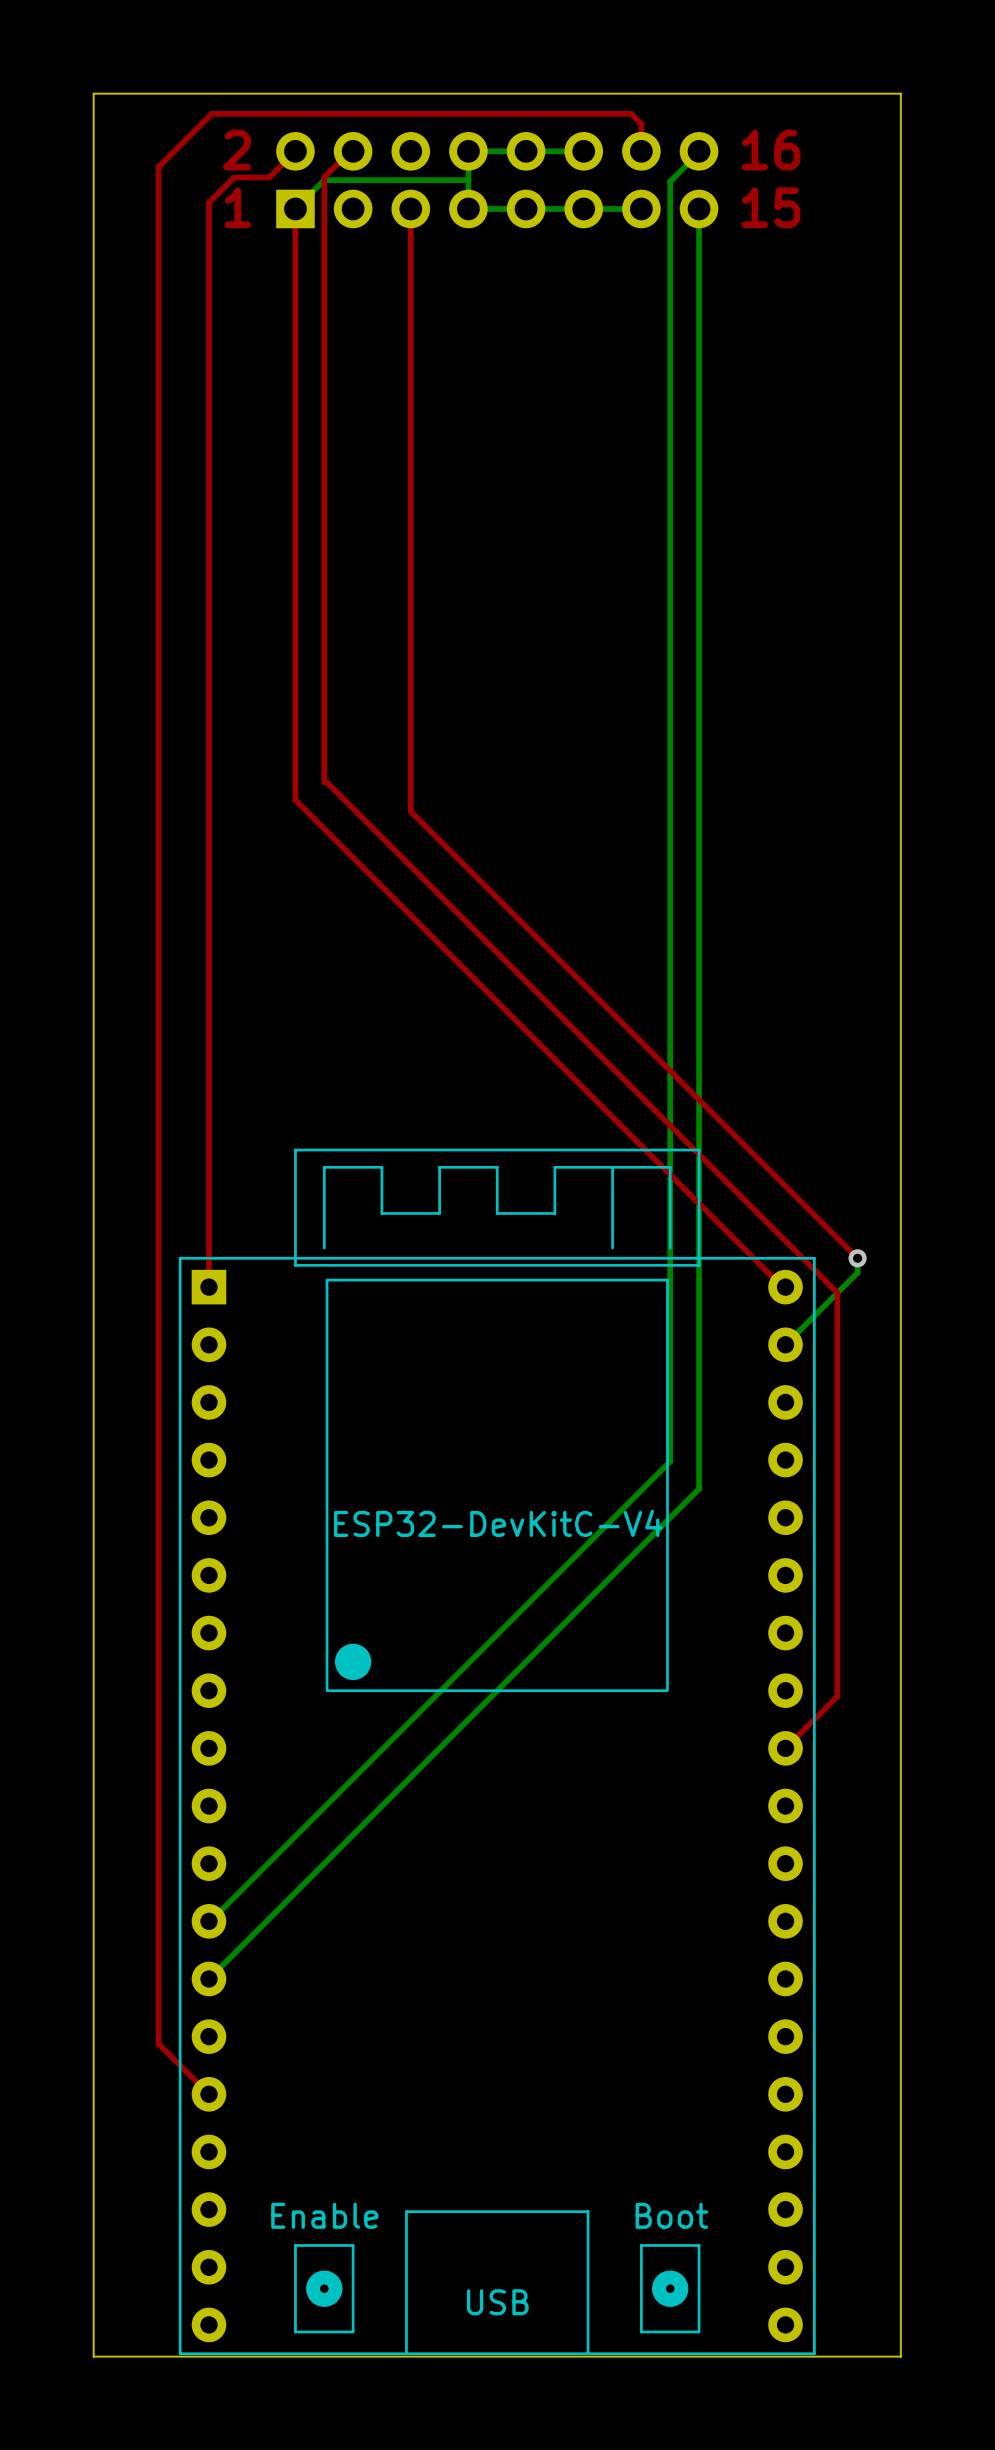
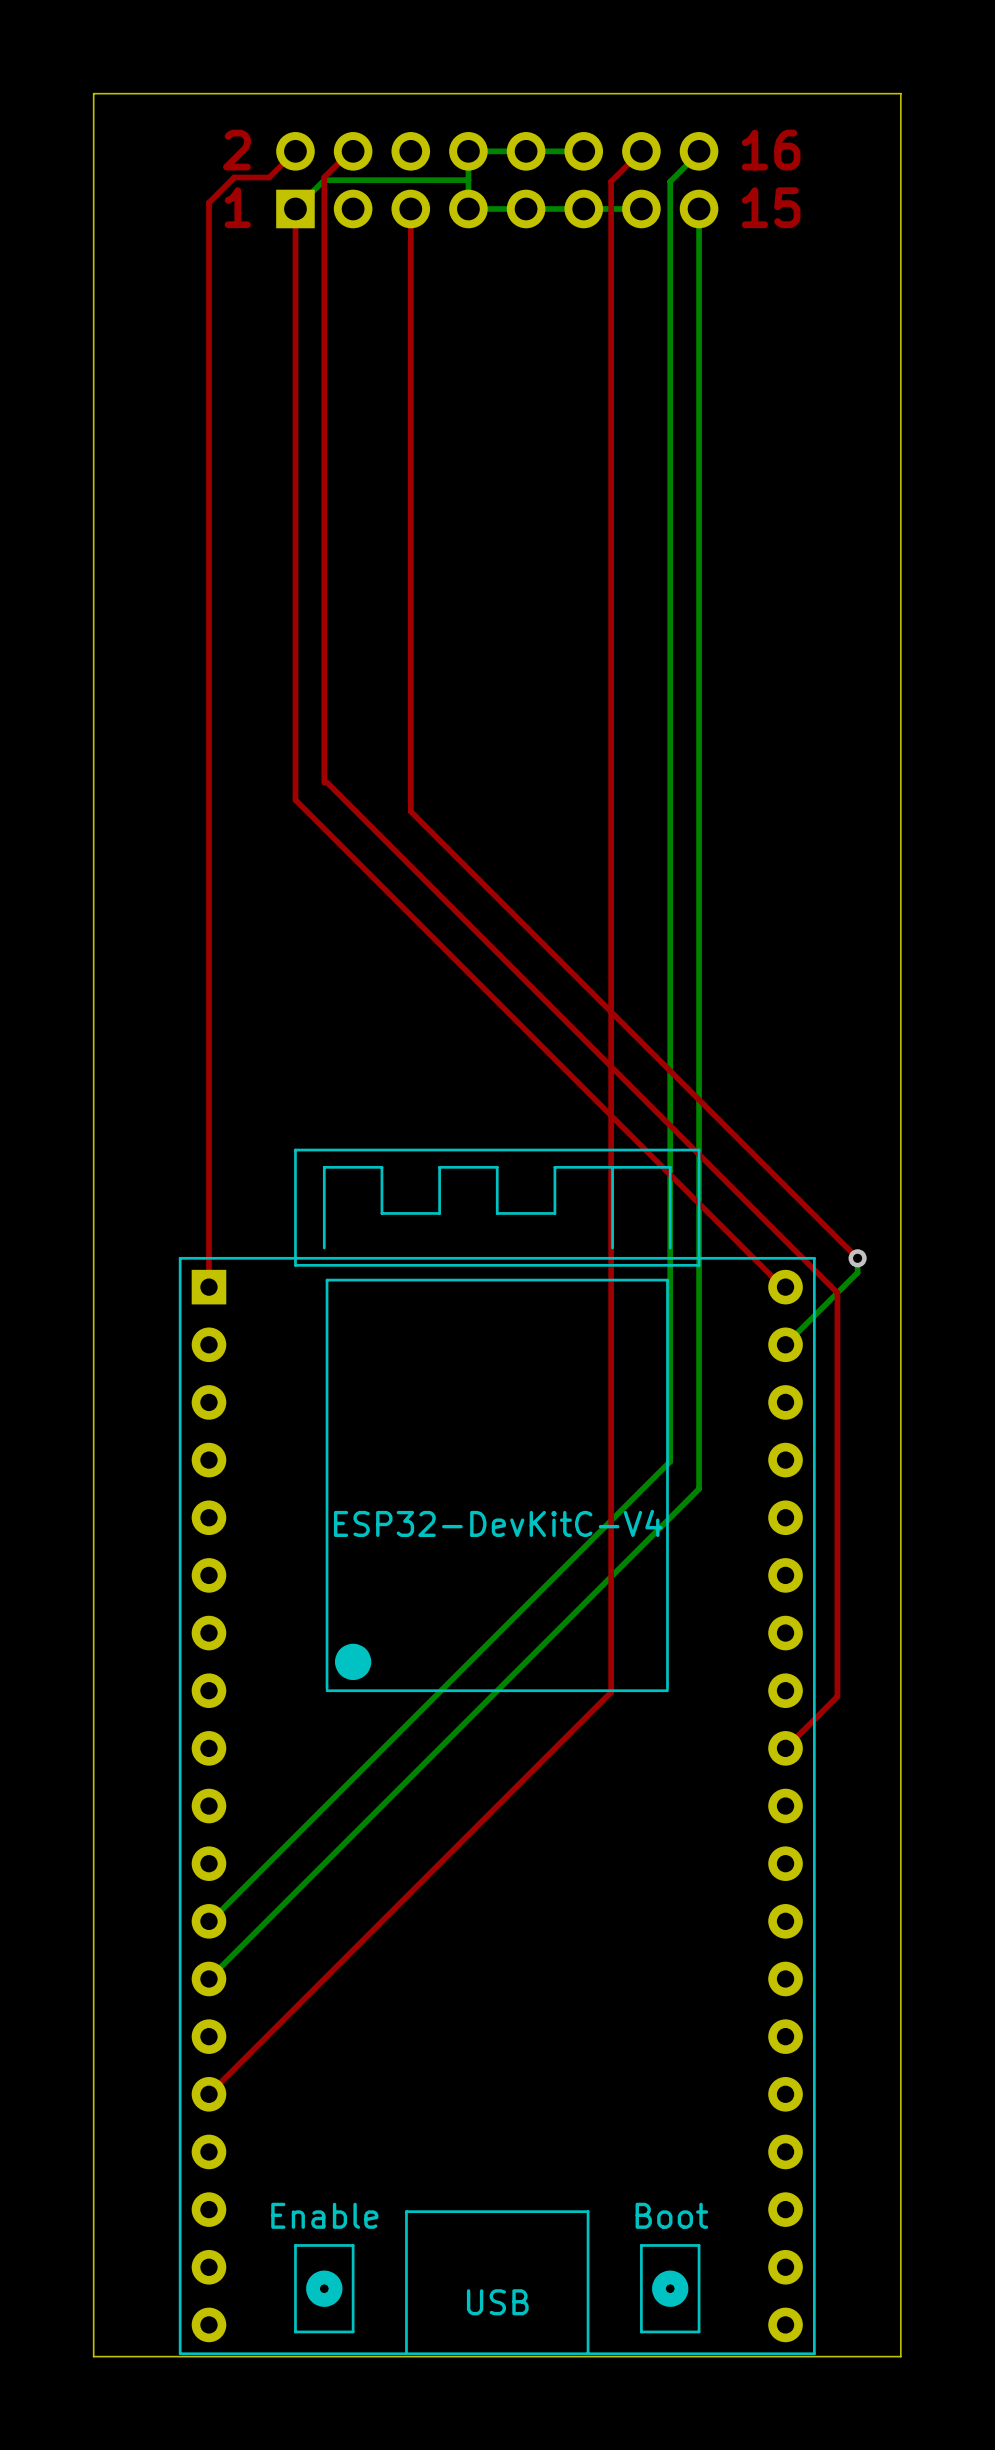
top track: (641, 151) (641, 123) (631, 113) (211, 113) (158, 167) (158, 2043) (208, 2094) -> (641, 151) (611, 181) (611, 1692) (208, 2094)

